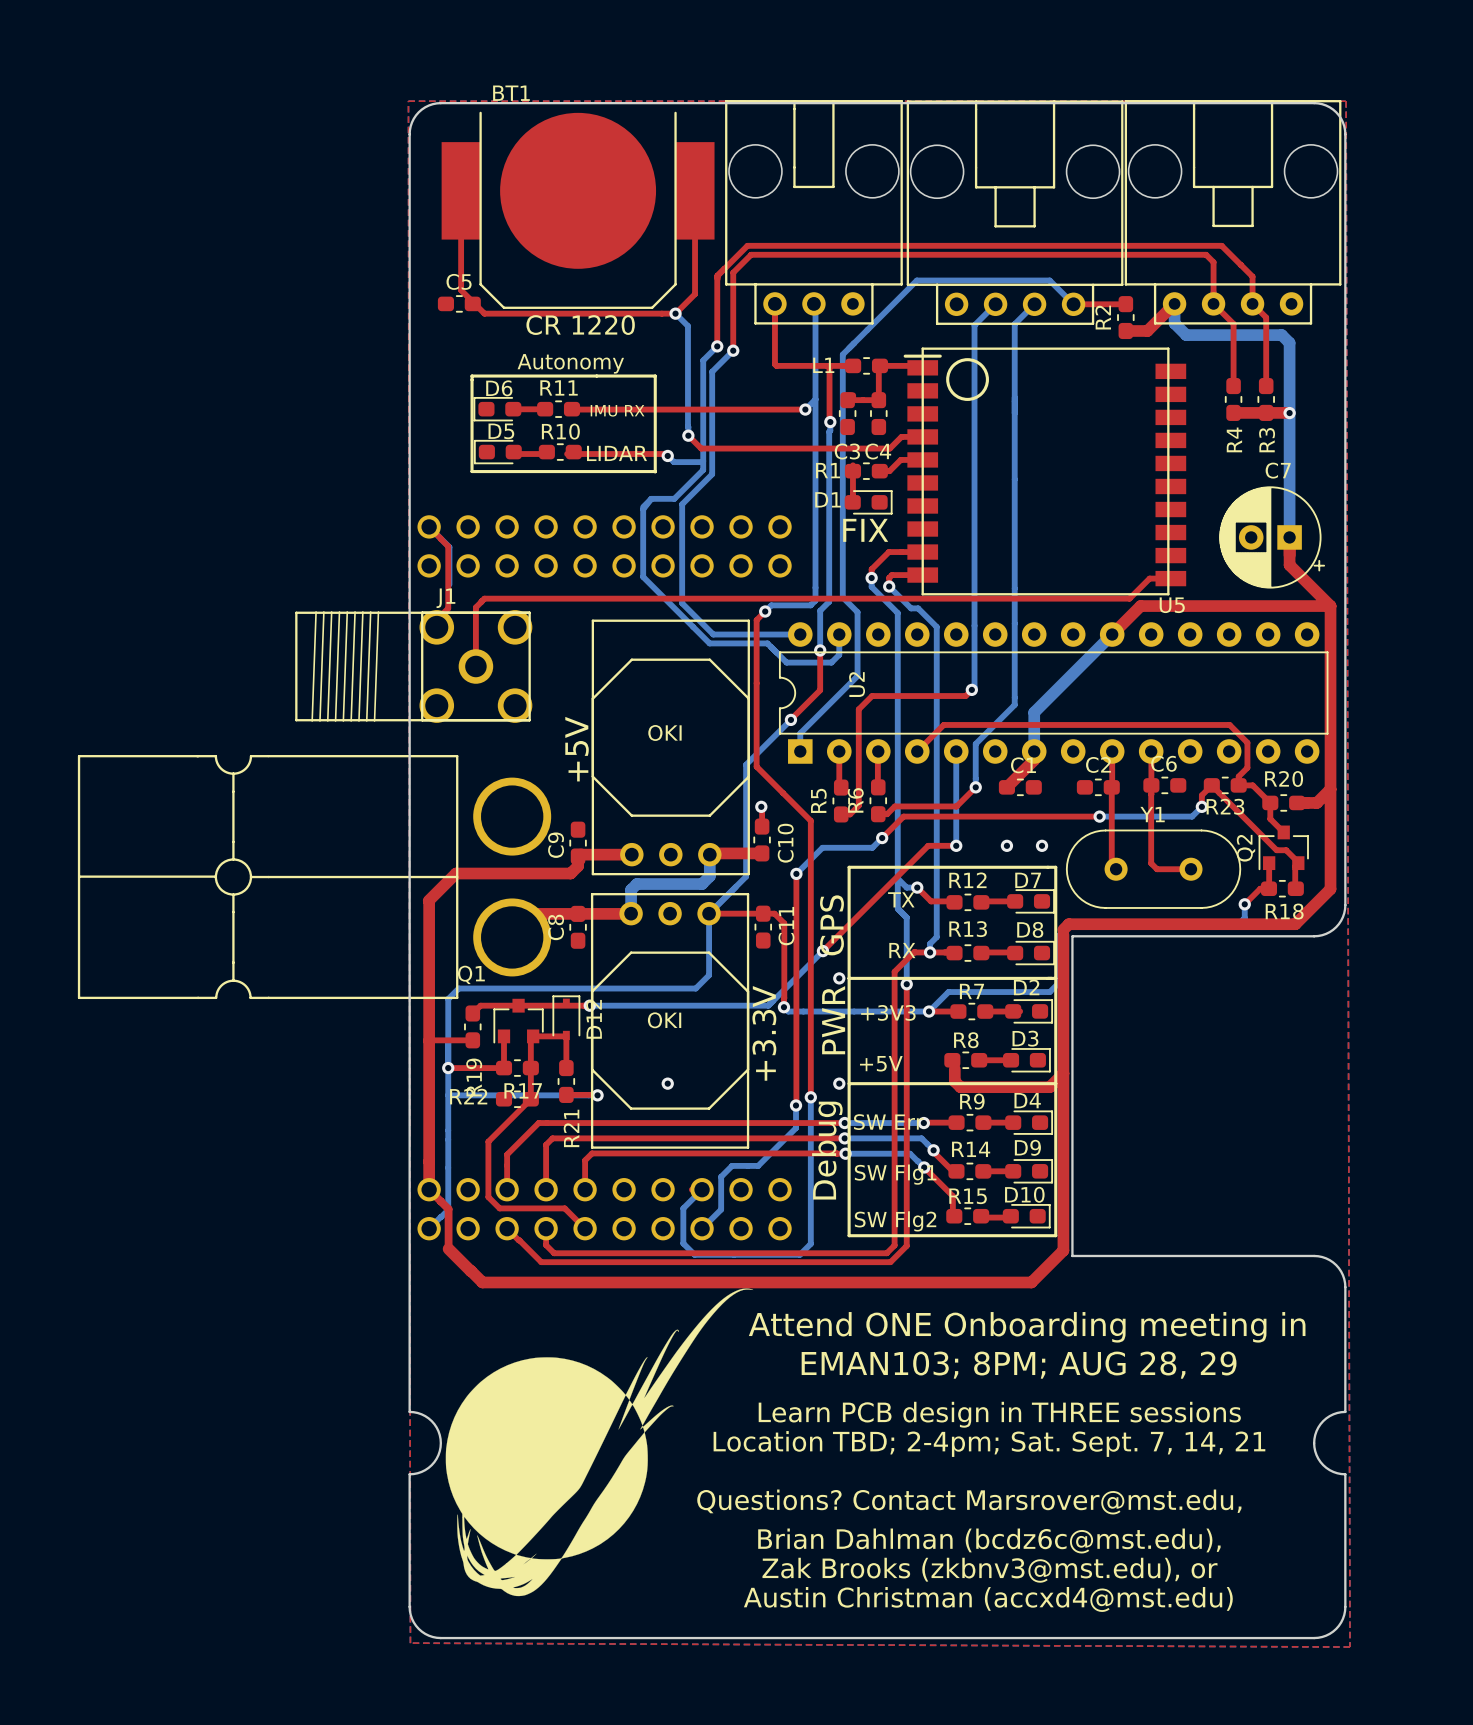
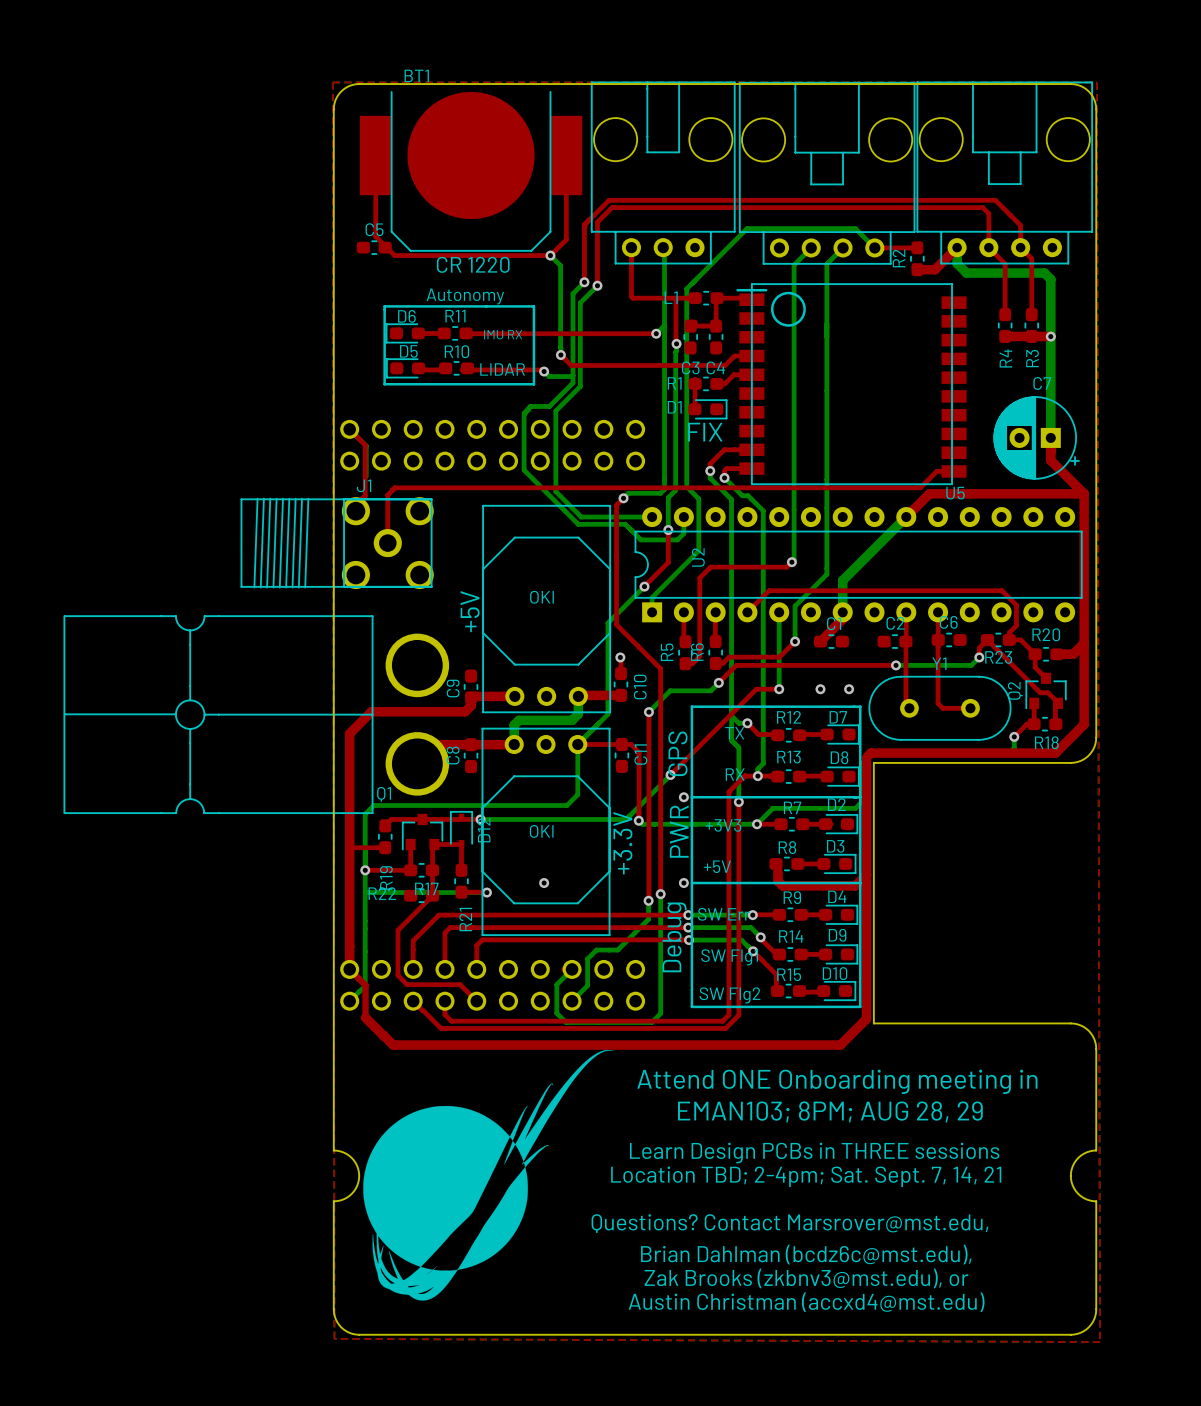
text: Learn PCB design in THREE sessions (999, 1414) -> Learn Design PCBs in THREE sessions (814, 1153)

